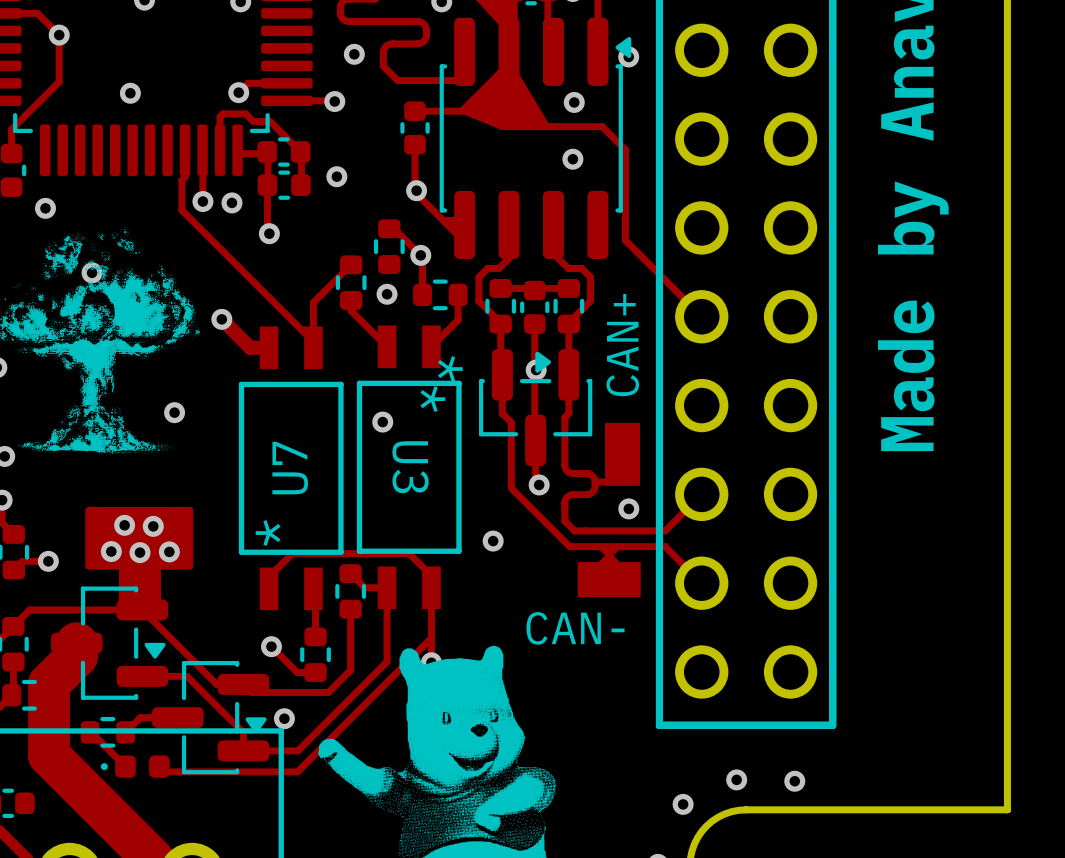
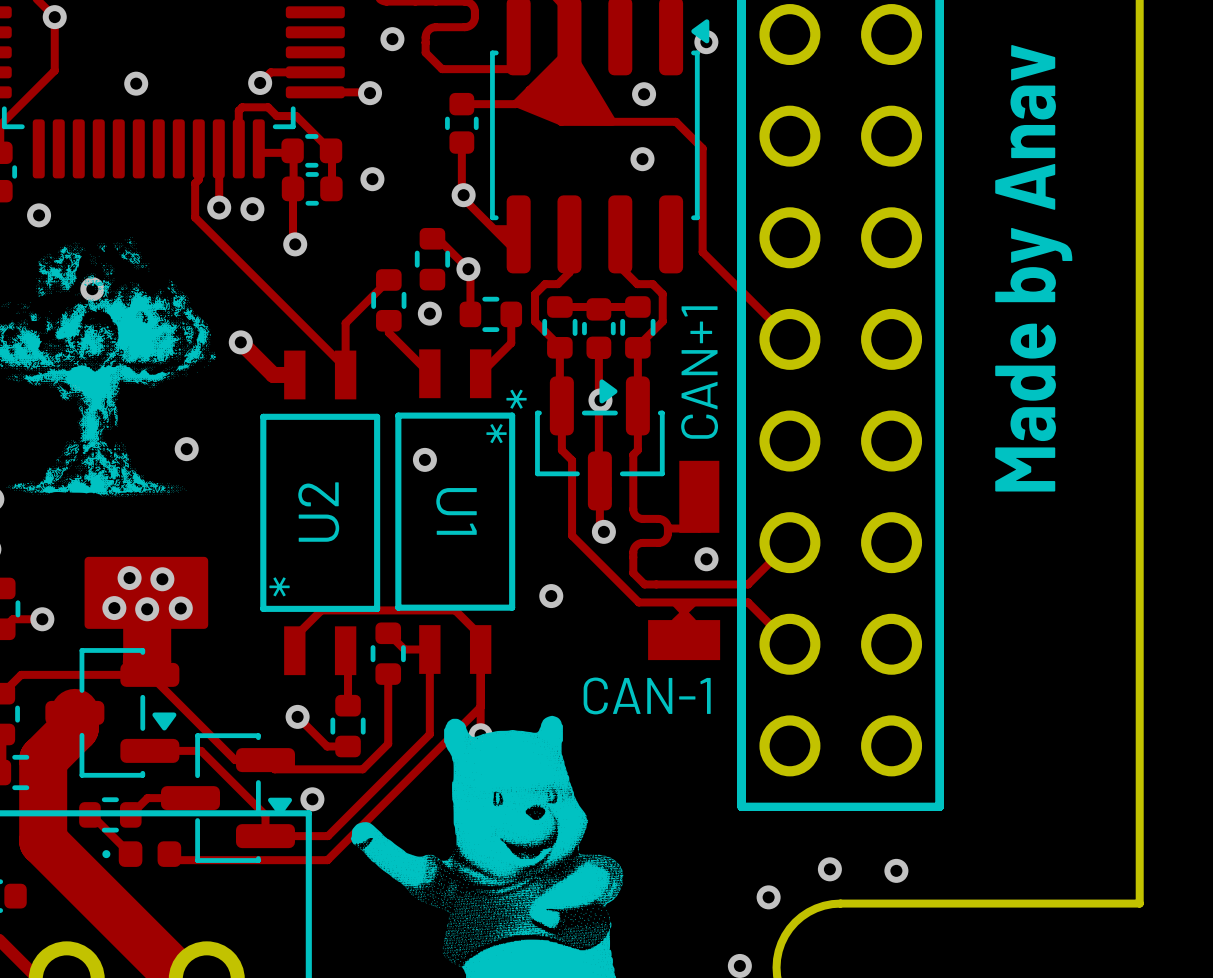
CAN+ name: CAN+ (622, 345) -> CAN+1 (699, 372)
U3 name: U3 (410, 467) -> U1 (456, 511)
U7 name: U7 (290, 468) -> U2 (318, 512)
CAN- name: CAN- (575, 628) -> CAN-1 (647, 695)

